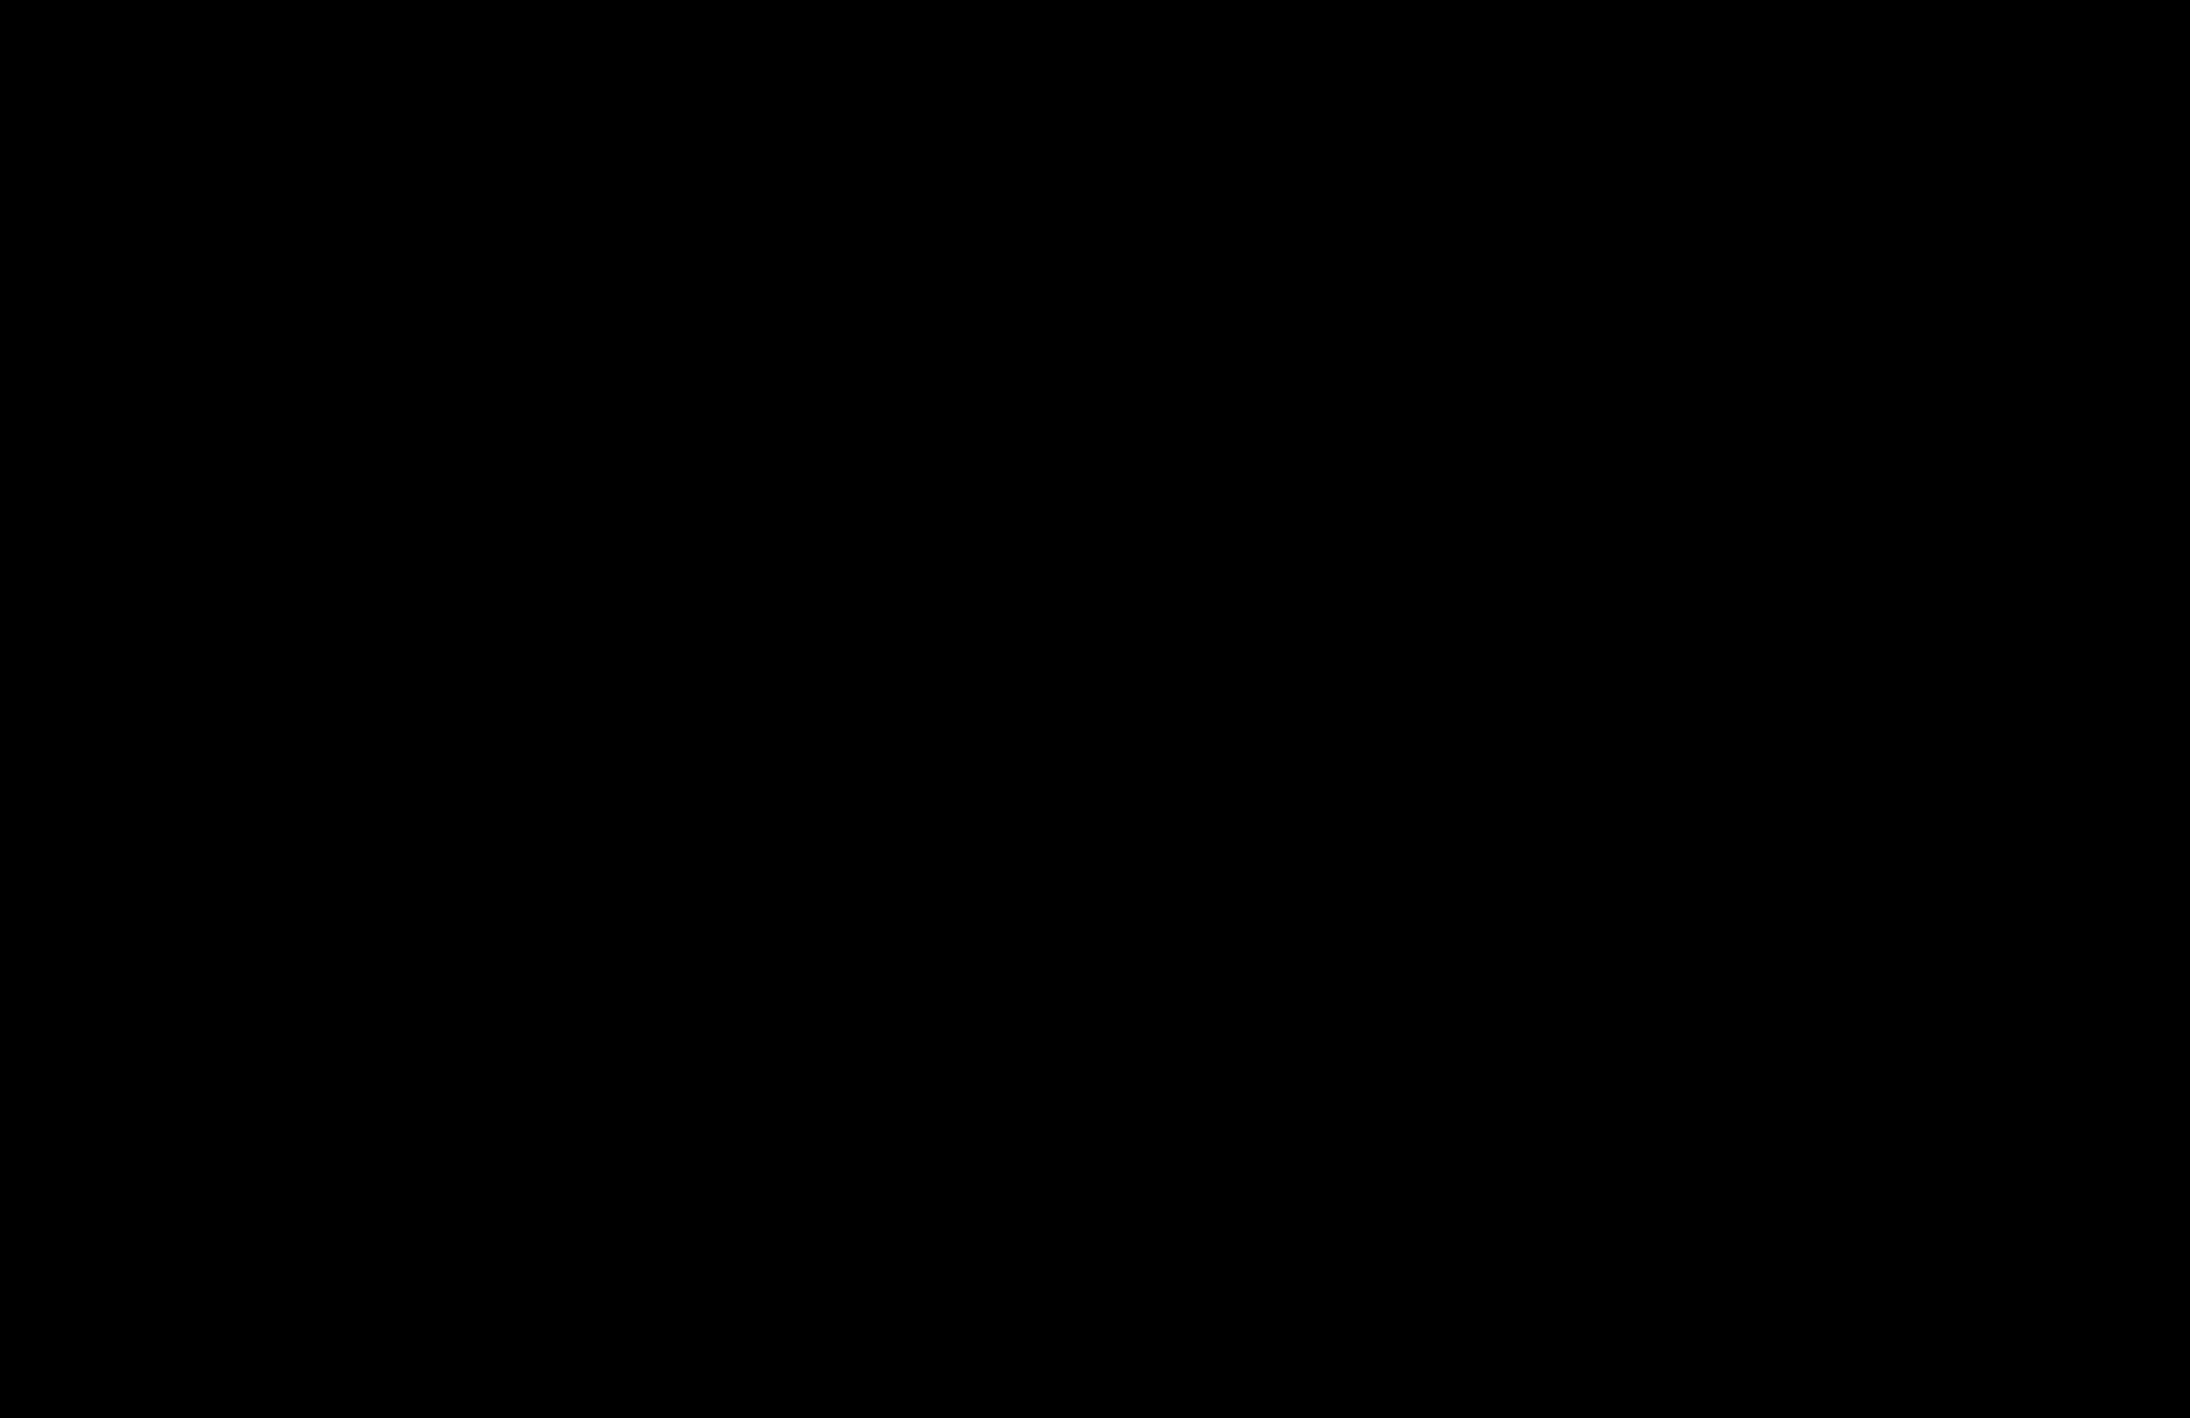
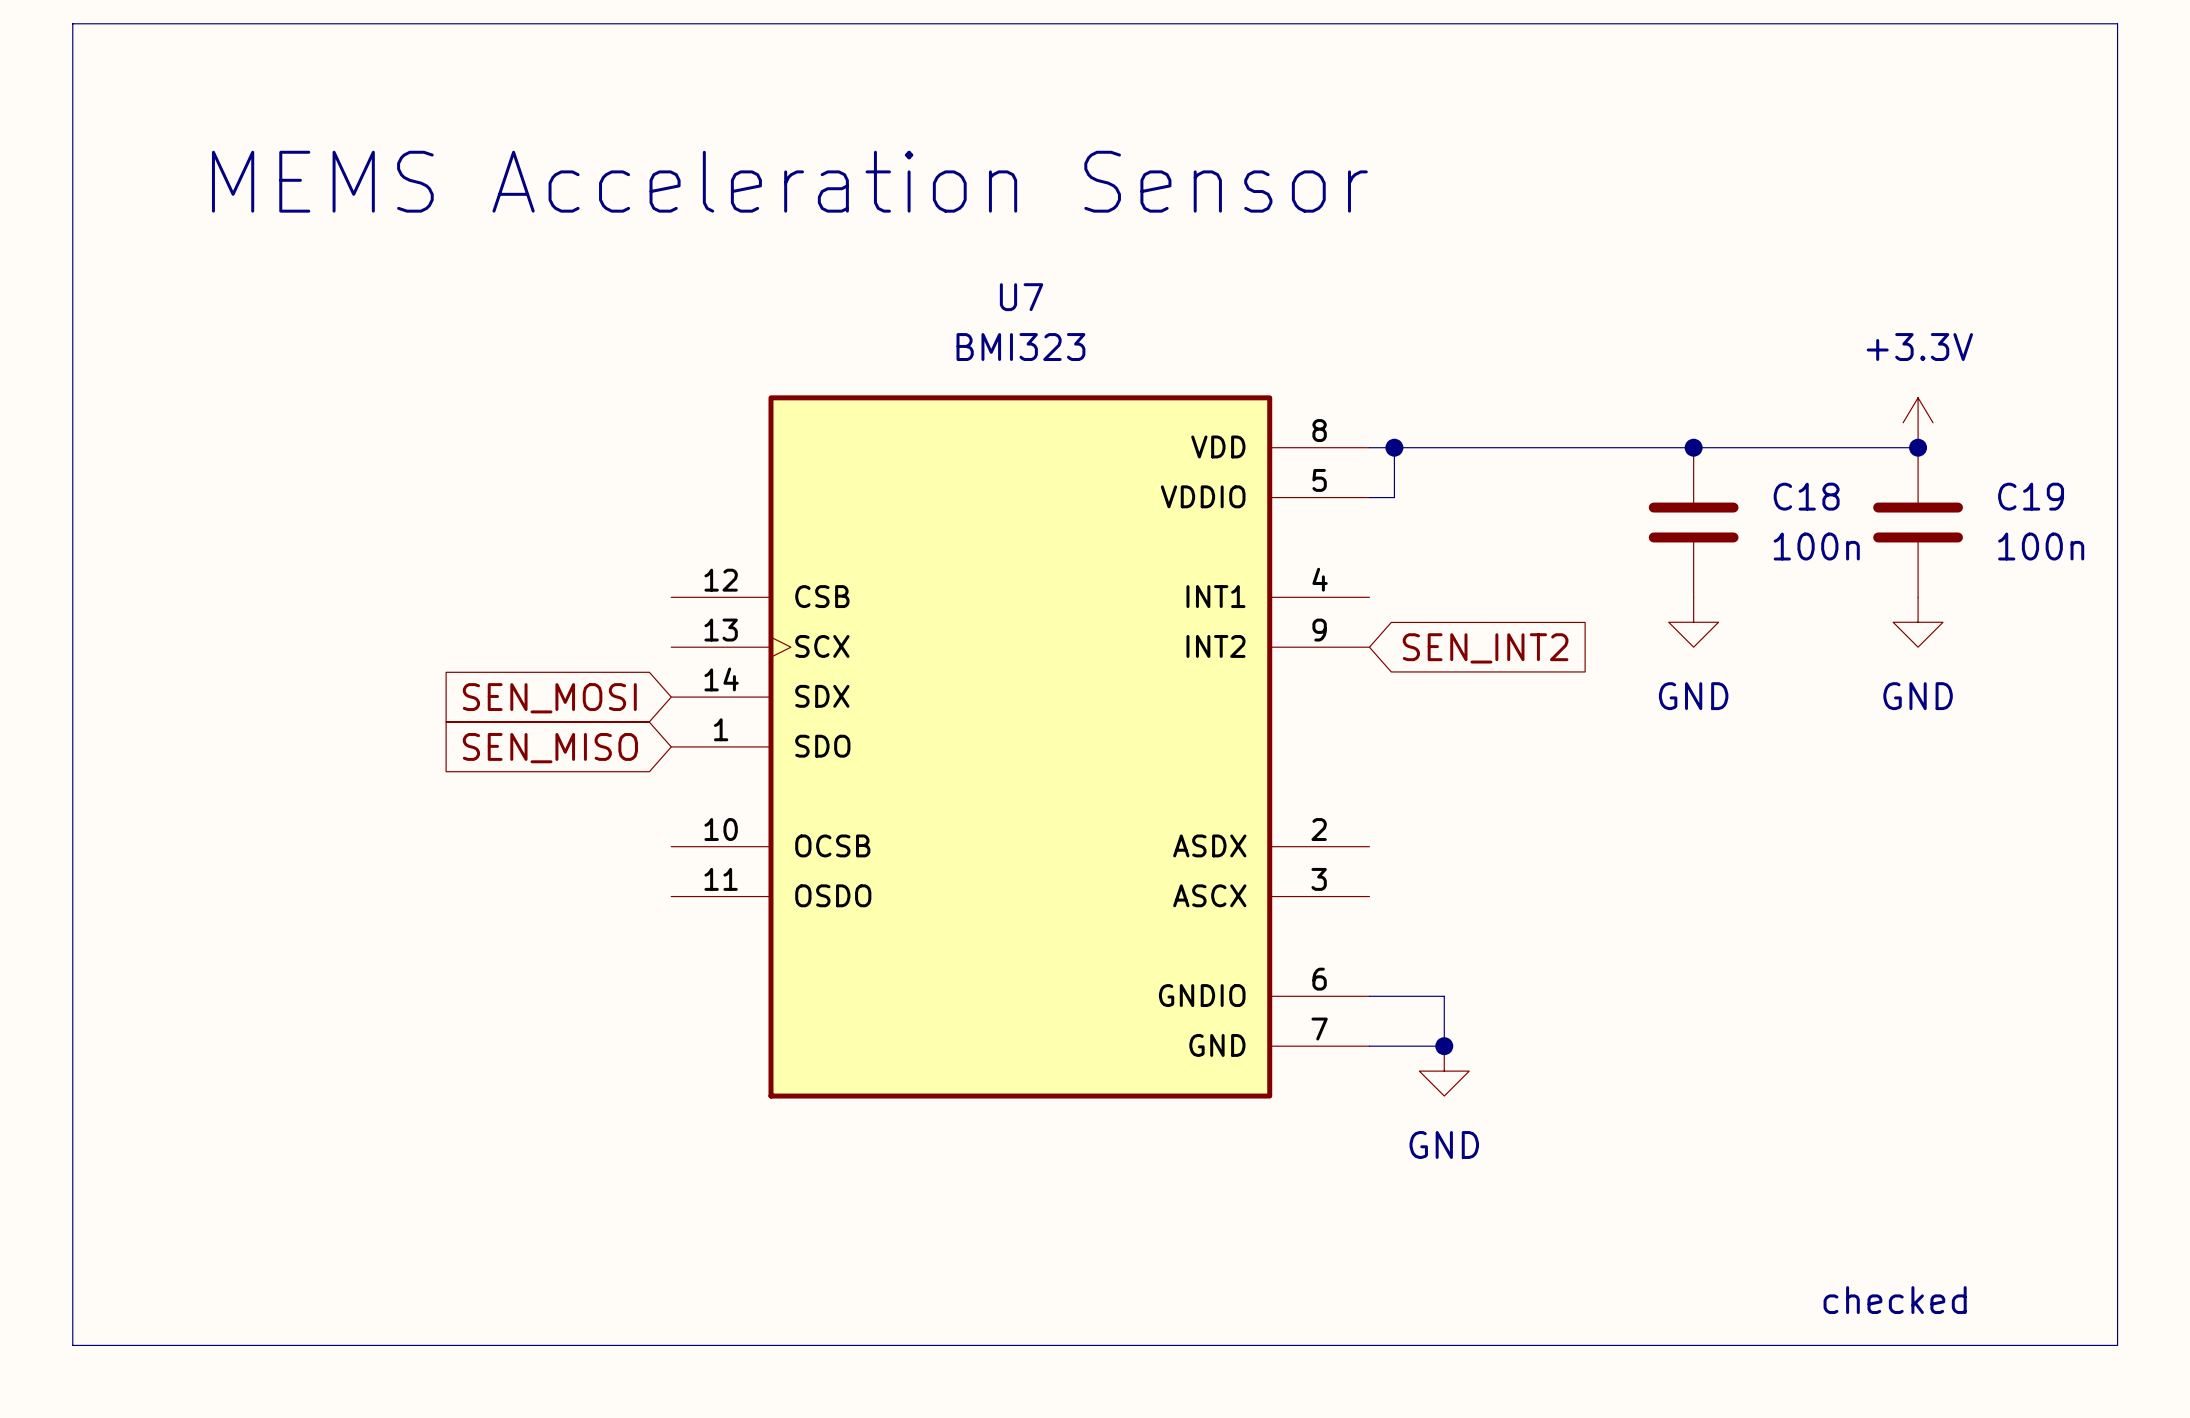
line: none -> (72, 23) (2117, 23) (2117, 1345) (72, 1345) (72, 23)
text: none -> MEMS Acceleration Sensor (789, 181)
power symbol: none -> +3.3V (1918, 422)
wire: none -> (1369, 447) (1918, 447)
wire: none -> (1394, 447) (1394, 497) (1369, 497)
junction: none -> (1394, 447)
junction: none -> (1693, 447)
junction: none -> (1918, 447)
C18: none -> 100n (1693, 522)
C19: none -> 100n (1918, 522)
power symbol: none -> GND (1693, 622)
power symbol: none -> GND (1918, 622)
global label: none -> SEN_INT2 (1485, 648)
global label: none -> SEN_MOSI (549, 698)
U7: none -> BMI323 (1020, 746)
global label: none -> SEN_MISO (550, 748)
wire: none -> (1369, 996) (1444, 996) (1444, 1046) (1369, 1046)
junction: none -> (1444, 1046)
power symbol: none -> GND (1444, 1071)
text: none -> checked (1895, 1300)

